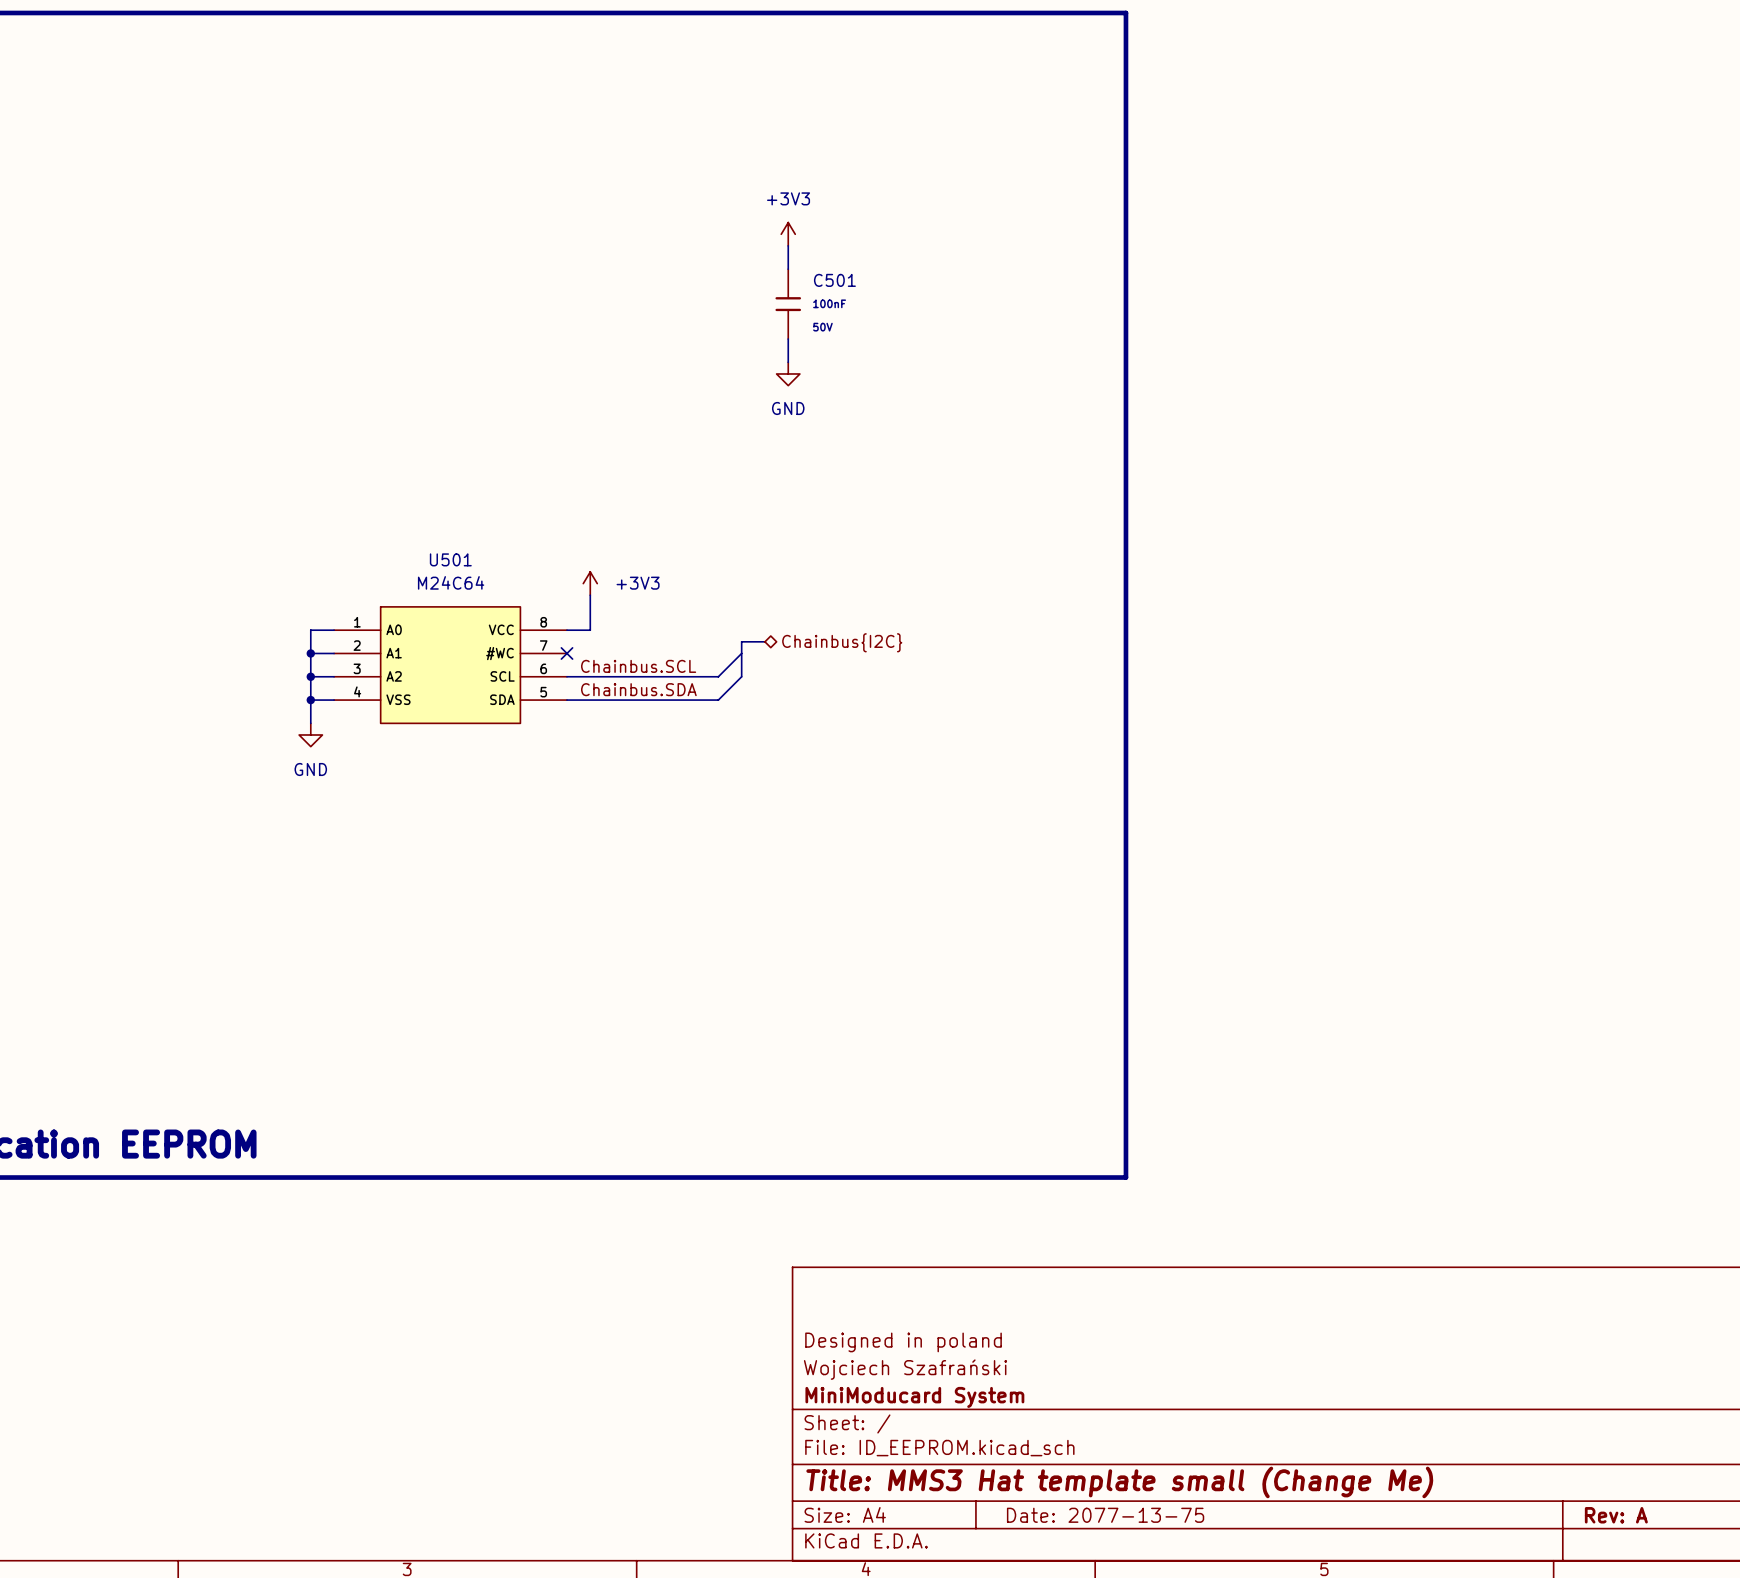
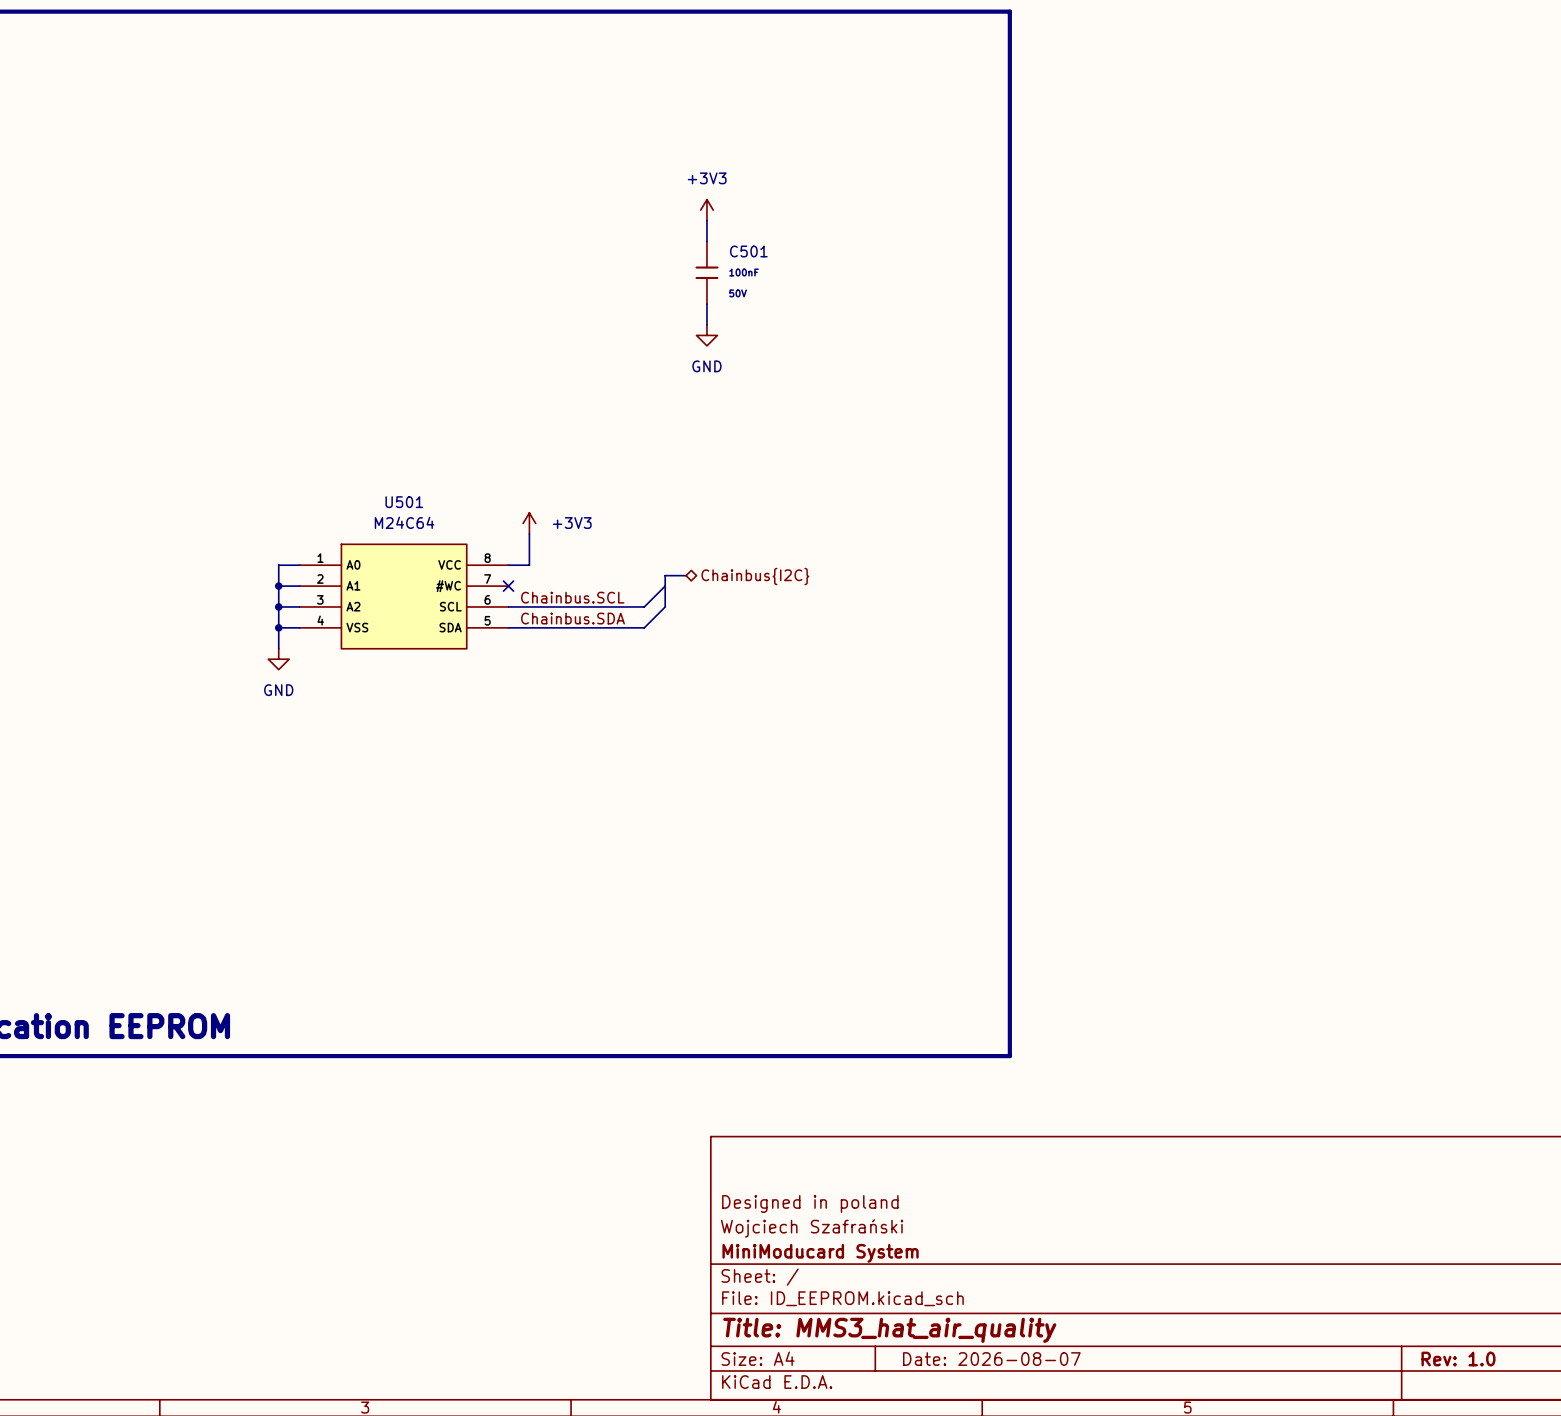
title block: Title: MMS3 Hat template small (Change Me) (1119, 1482) -> Title: MMS3_hat_air_quality (889, 1330)
title block: Date: 2077-13-75 (1105, 1515) -> Date: 2026-08-07 (991, 1359)
title block: Rev: A (1616, 1515) -> Rev: 1.0 (1458, 1359)

